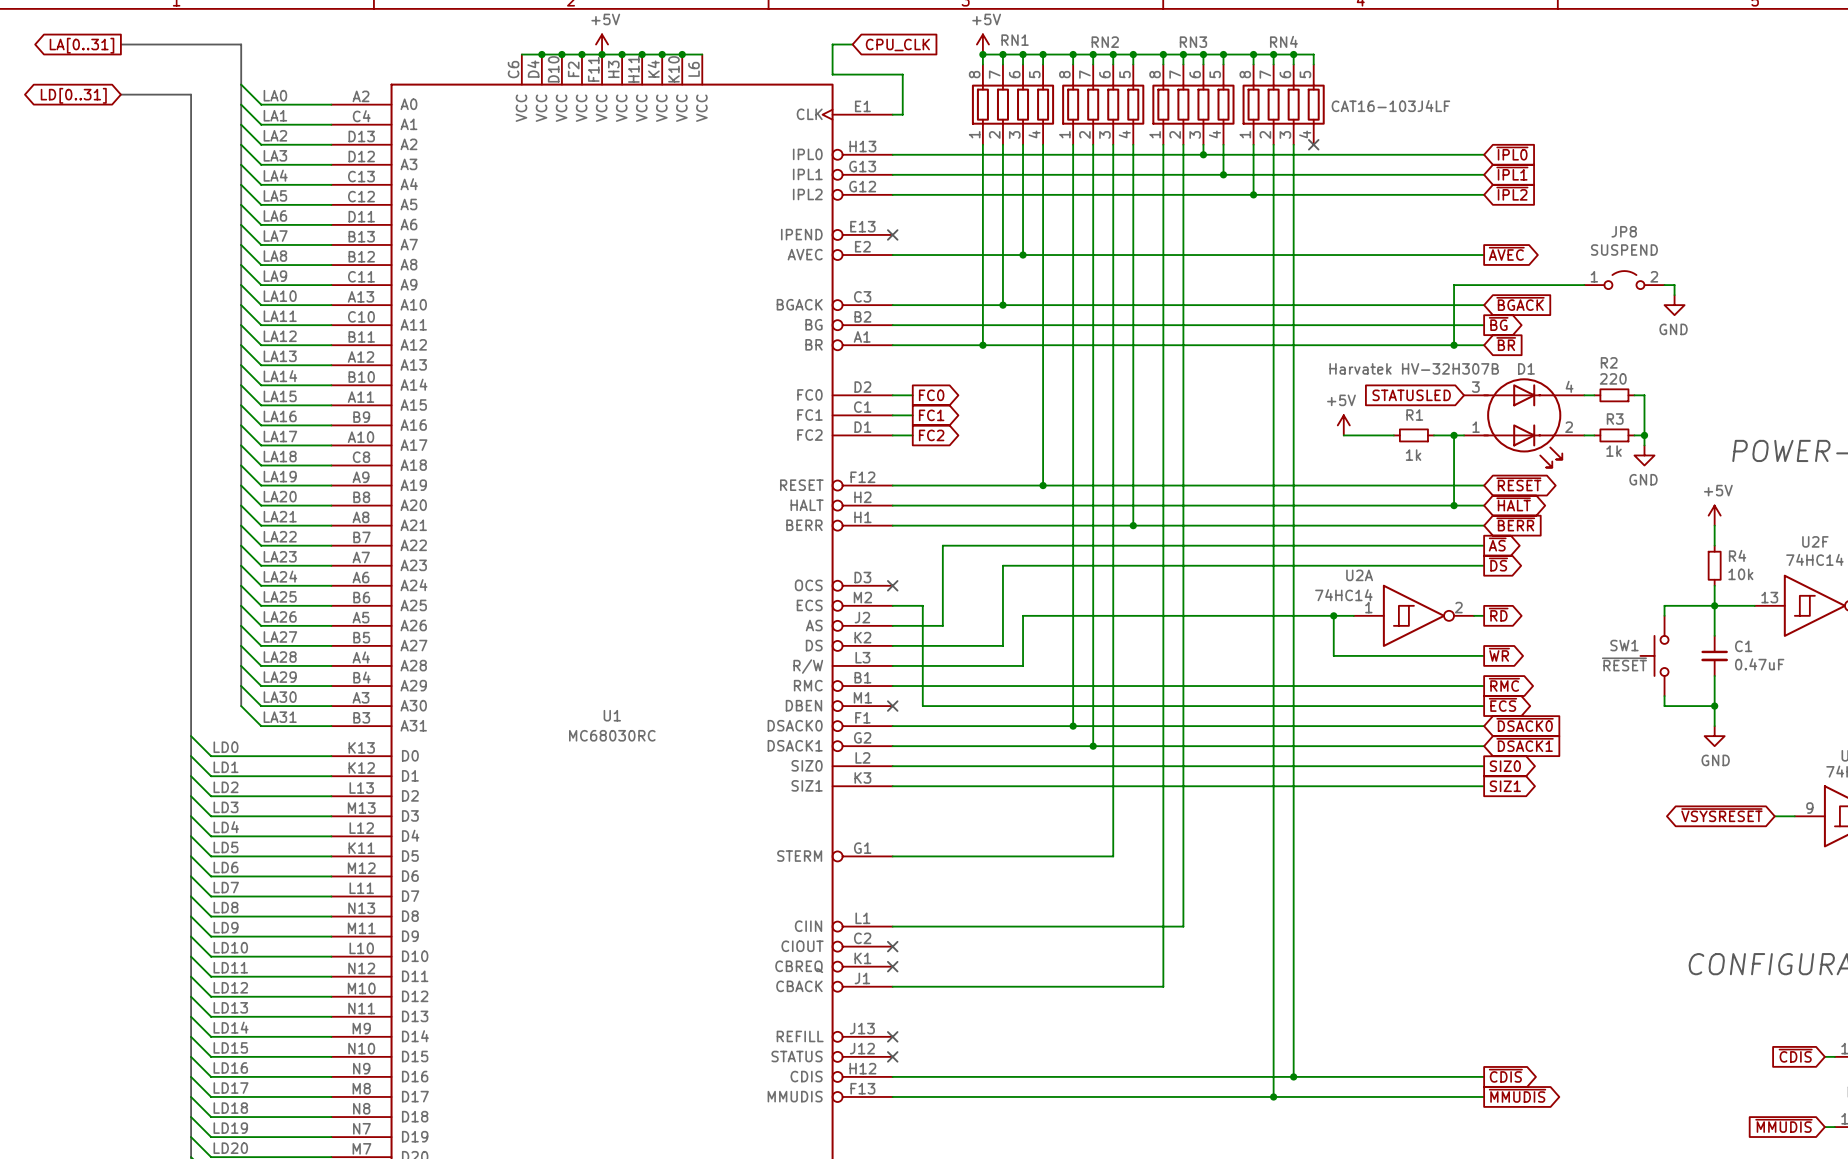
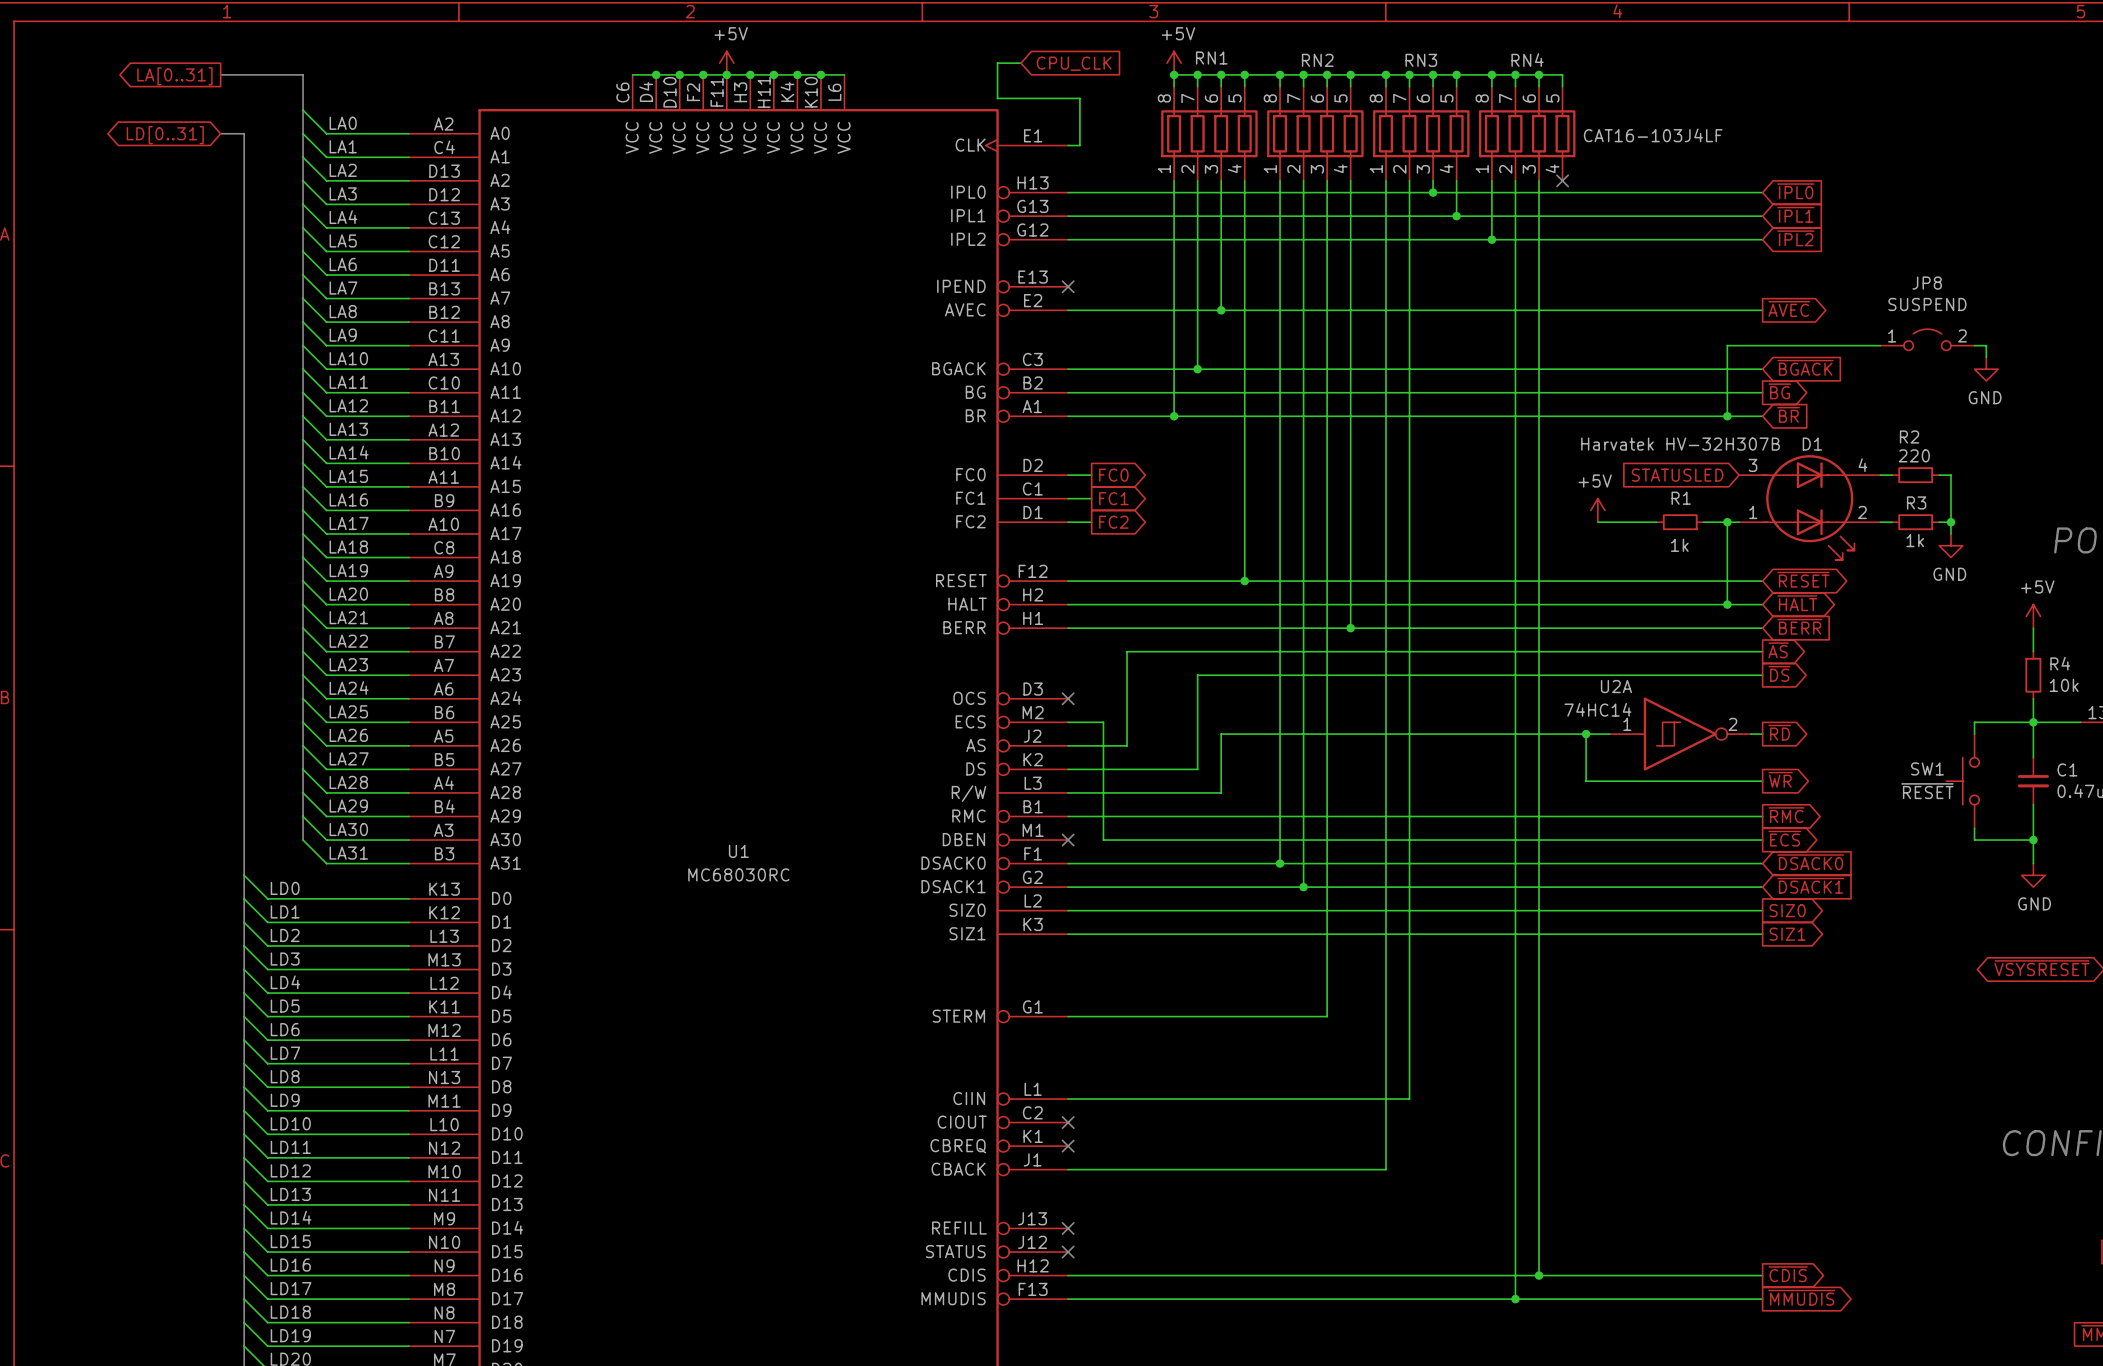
bus: (120, 44) (241, 44) (241, 54) -> (220, 74) (303, 74)
global label position: LA[0..31] (81, 45) -> LA[0..31] (174, 76)
bus: (120, 94) (191, 94) (191, 104) -> (220, 133) (244, 133)
global label position: LD[0..31] (73, 95) -> LD[0..31] (165, 135)

